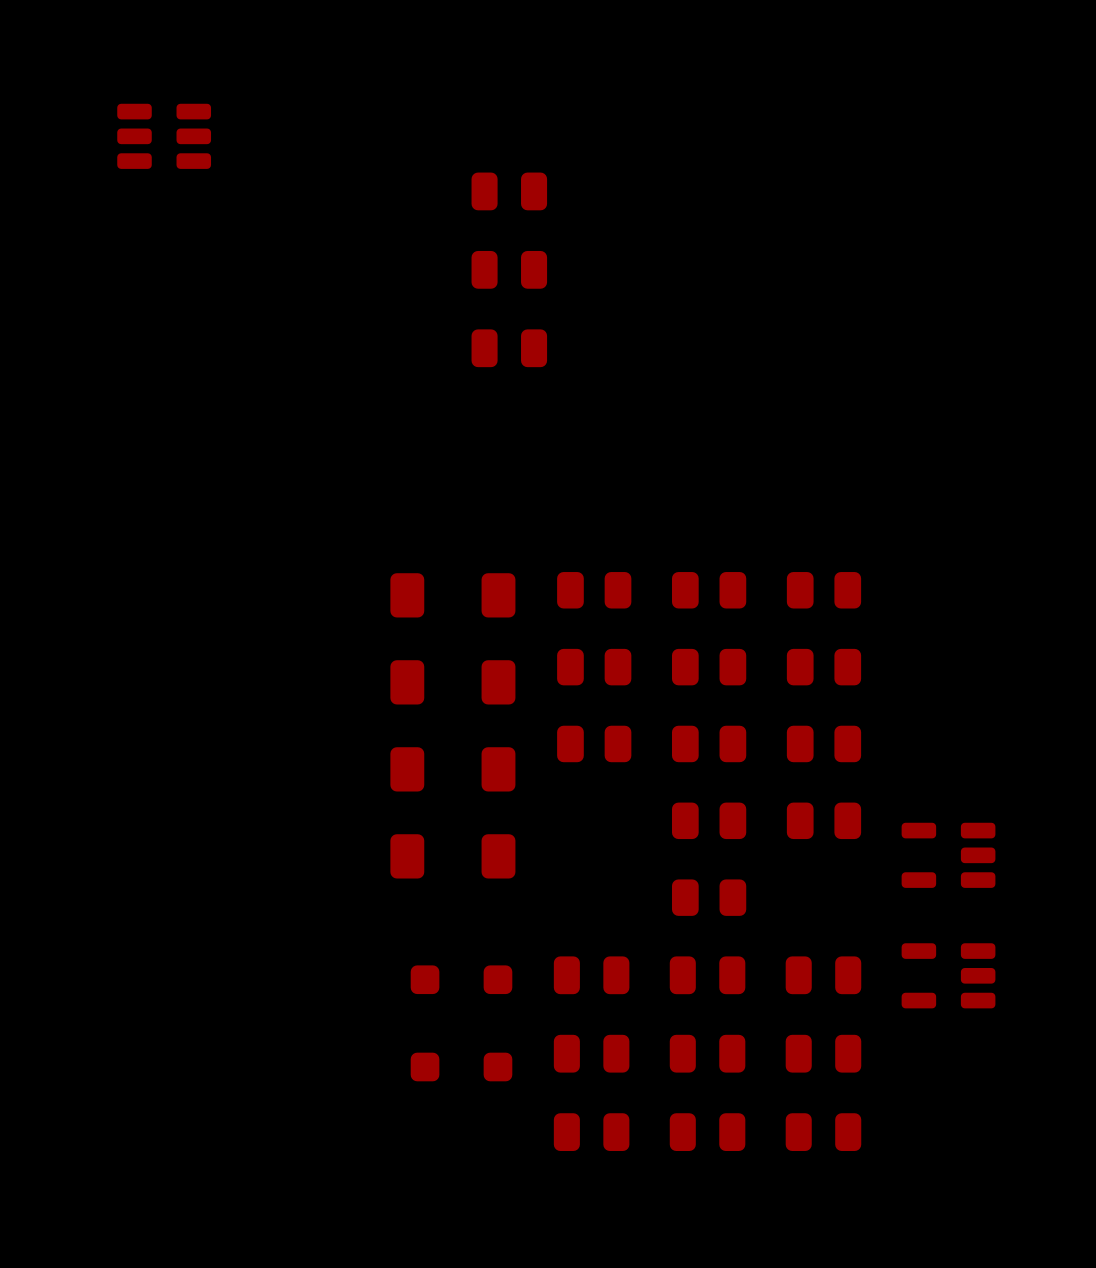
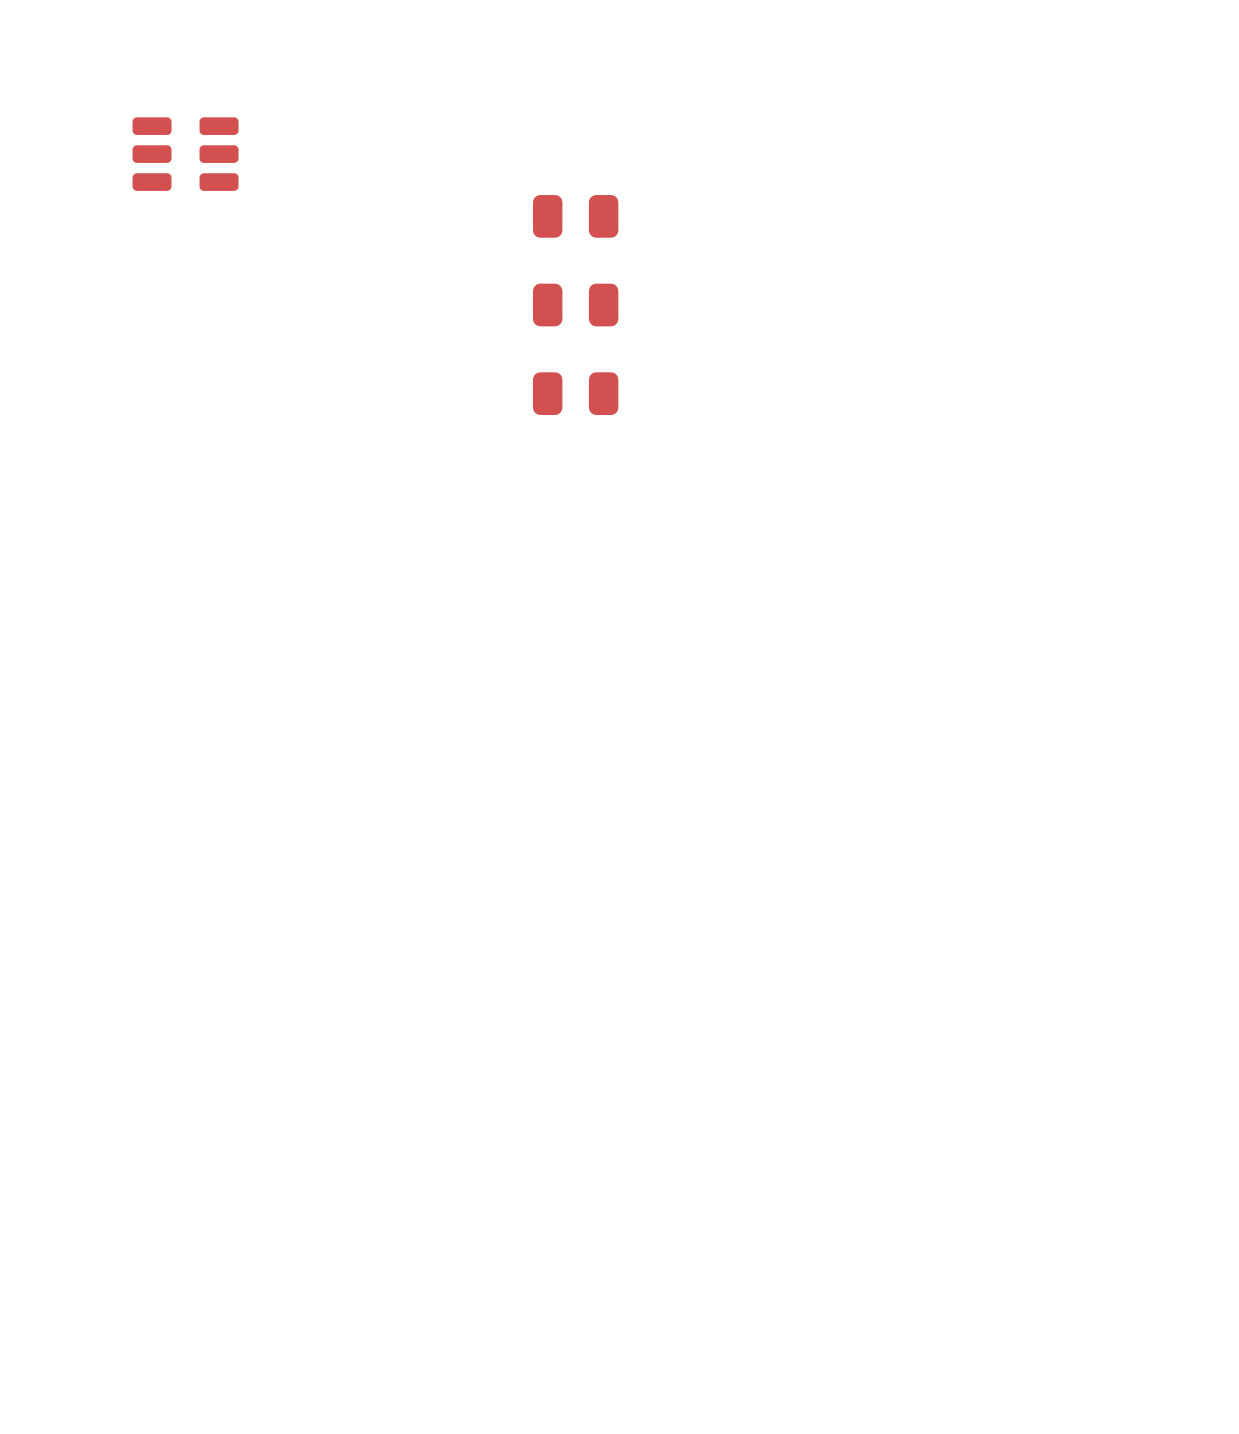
part: (594, 590) -> none
part: (709, 590) -> none
part: (823, 590) -> none
part: (452, 595) -> none
part: (594, 667) -> none
part: (709, 667) -> none
part: (823, 667) -> none
part: (452, 682) -> none
part: (594, 743) -> none
part: (709, 743) -> none
part: (823, 743) -> none
part: (452, 769) -> none
part: (709, 820) -> none
part: (823, 820) -> none
part: (948, 855) -> none
part: (452, 856) -> none
part: (709, 897) -> none
part: (591, 975) -> none
part: (707, 975) -> none
part: (823, 975) -> none
part: (948, 975) -> none
part: (461, 979) -> none
part: (591, 1053) -> none
part: (707, 1053) -> none
part: (823, 1053) -> none
part: (461, 1066) -> none
part: (591, 1132) -> none
part: (707, 1132) -> none
part: (823, 1132) -> none

